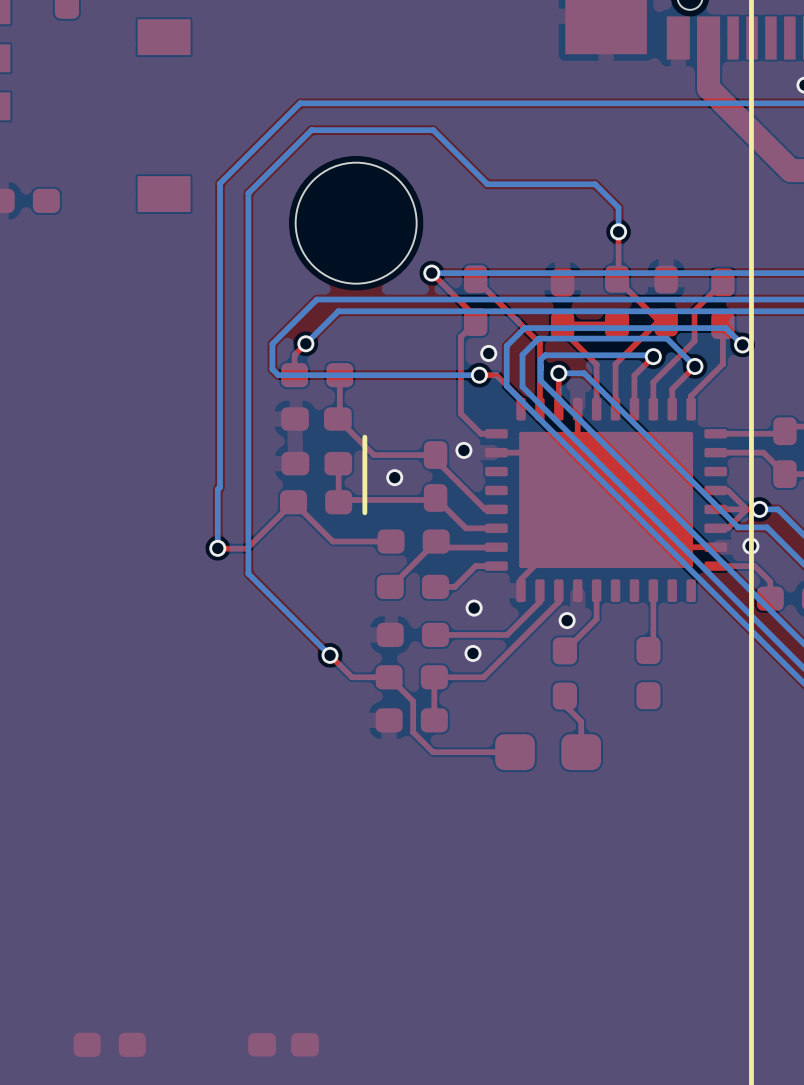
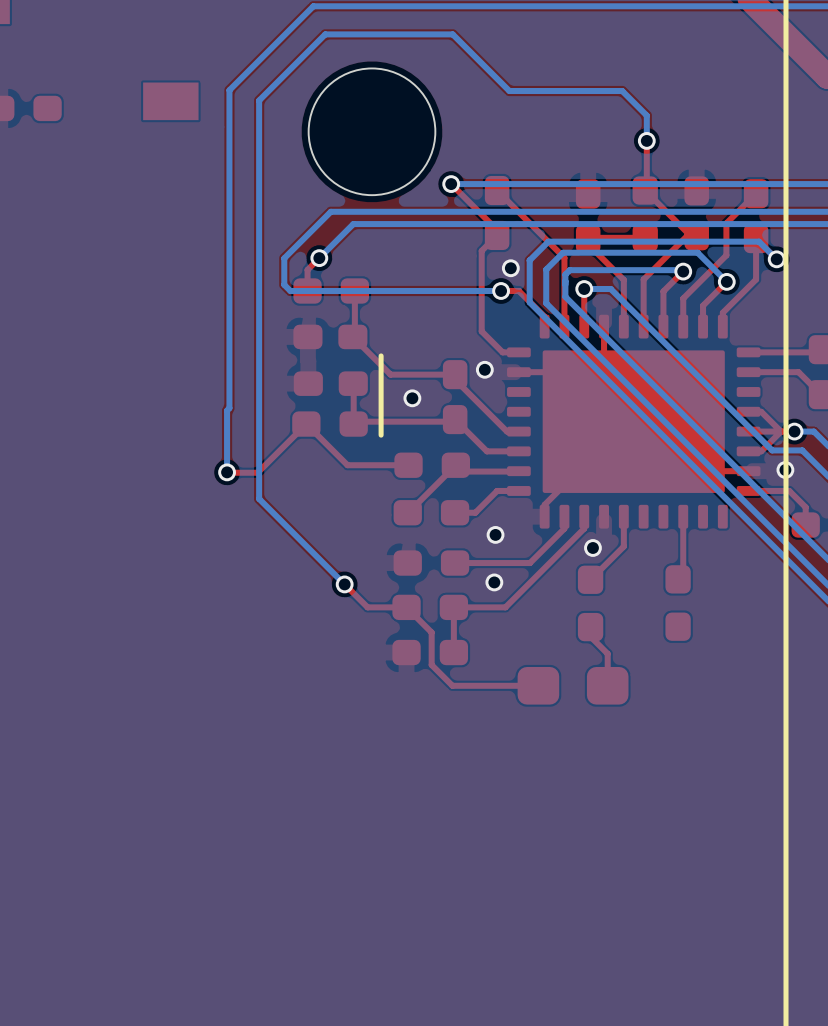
part: (109, 1044) -> none
part: (283, 1044) -> none

